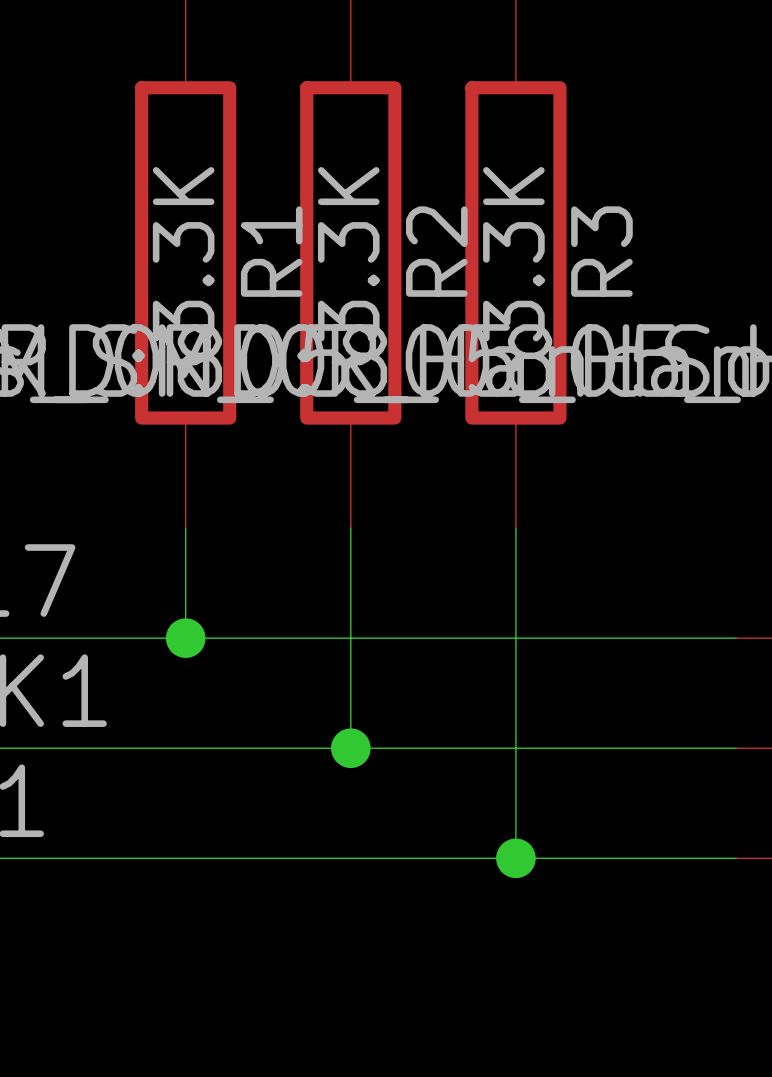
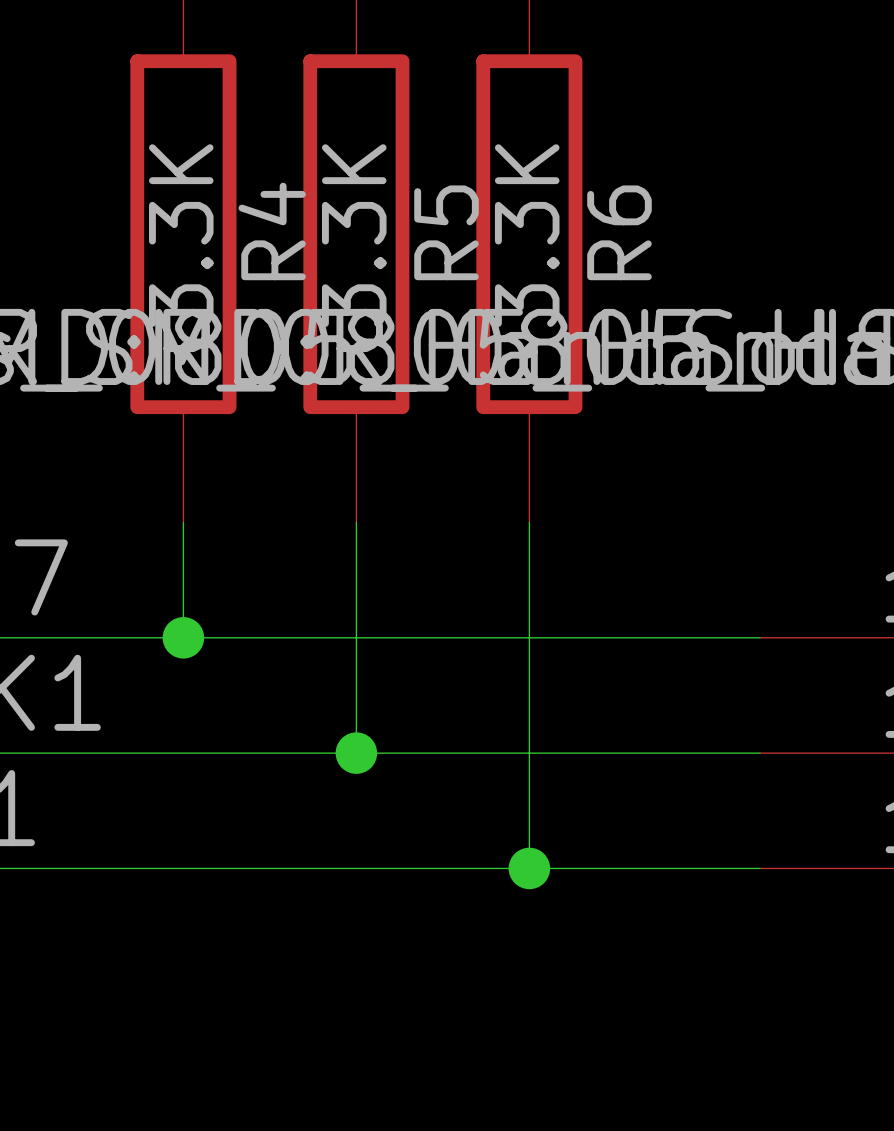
R1 name: R1 (271, 251) -> R4 (272, 231)
R2 name: R2 (436, 251) -> R5 (446, 232)
R3 name: R3 (601, 251) -> R6 (619, 232)

